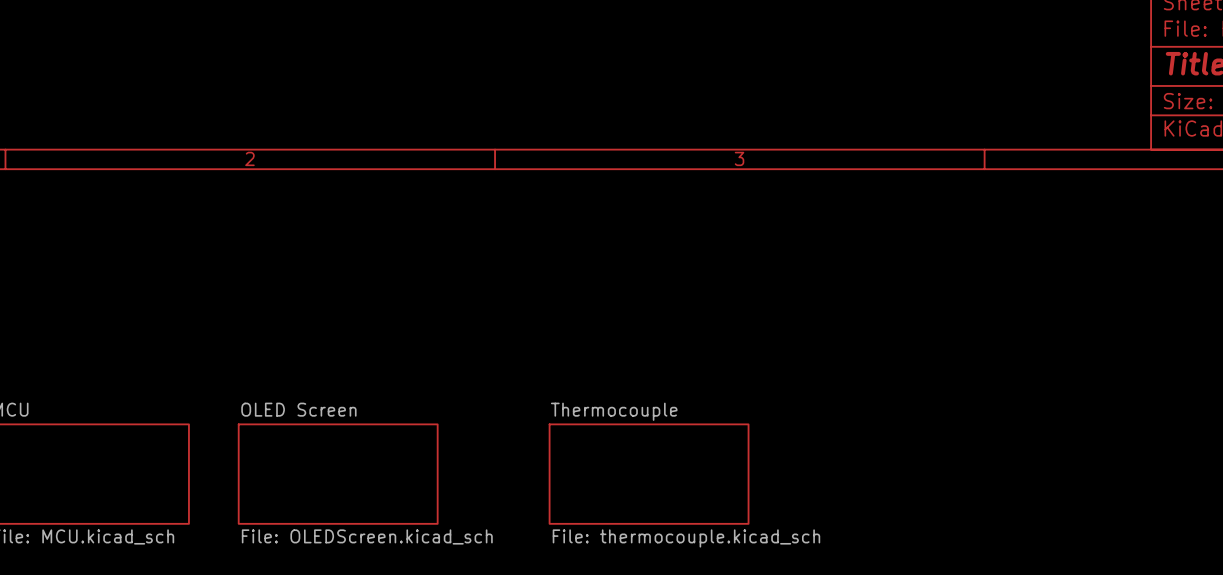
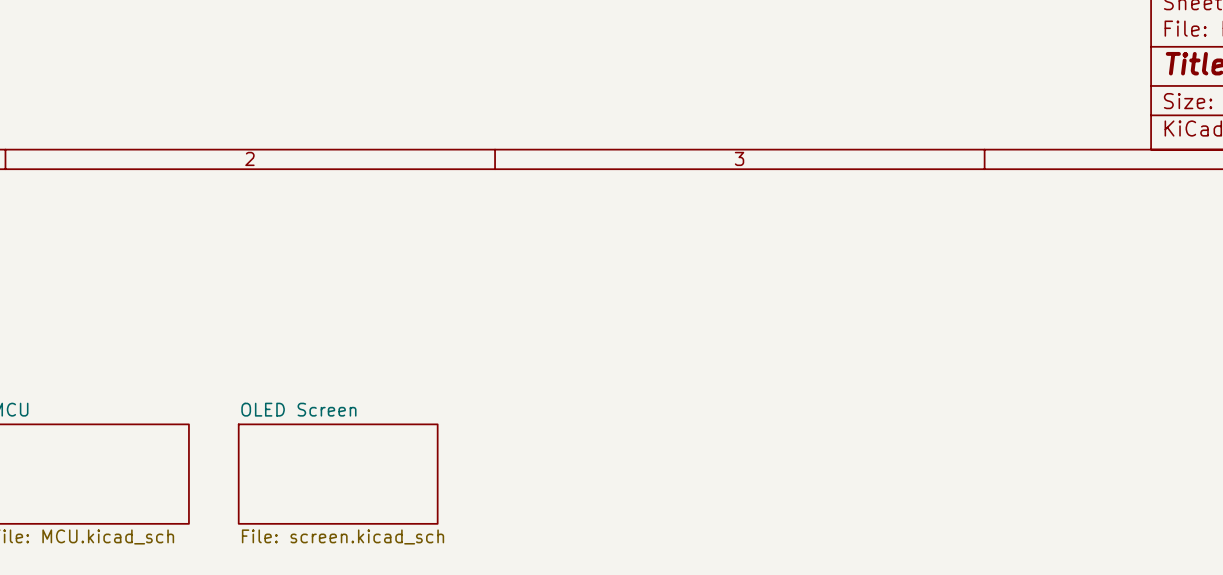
sheet Thermocouple: File: thermocouple.kicad_sch (649, 474) -> none
sheet OLED Screen value: File: OLEDScreen.kicad_sch (367, 536) -> File: screen.kicad_sch (343, 536)

